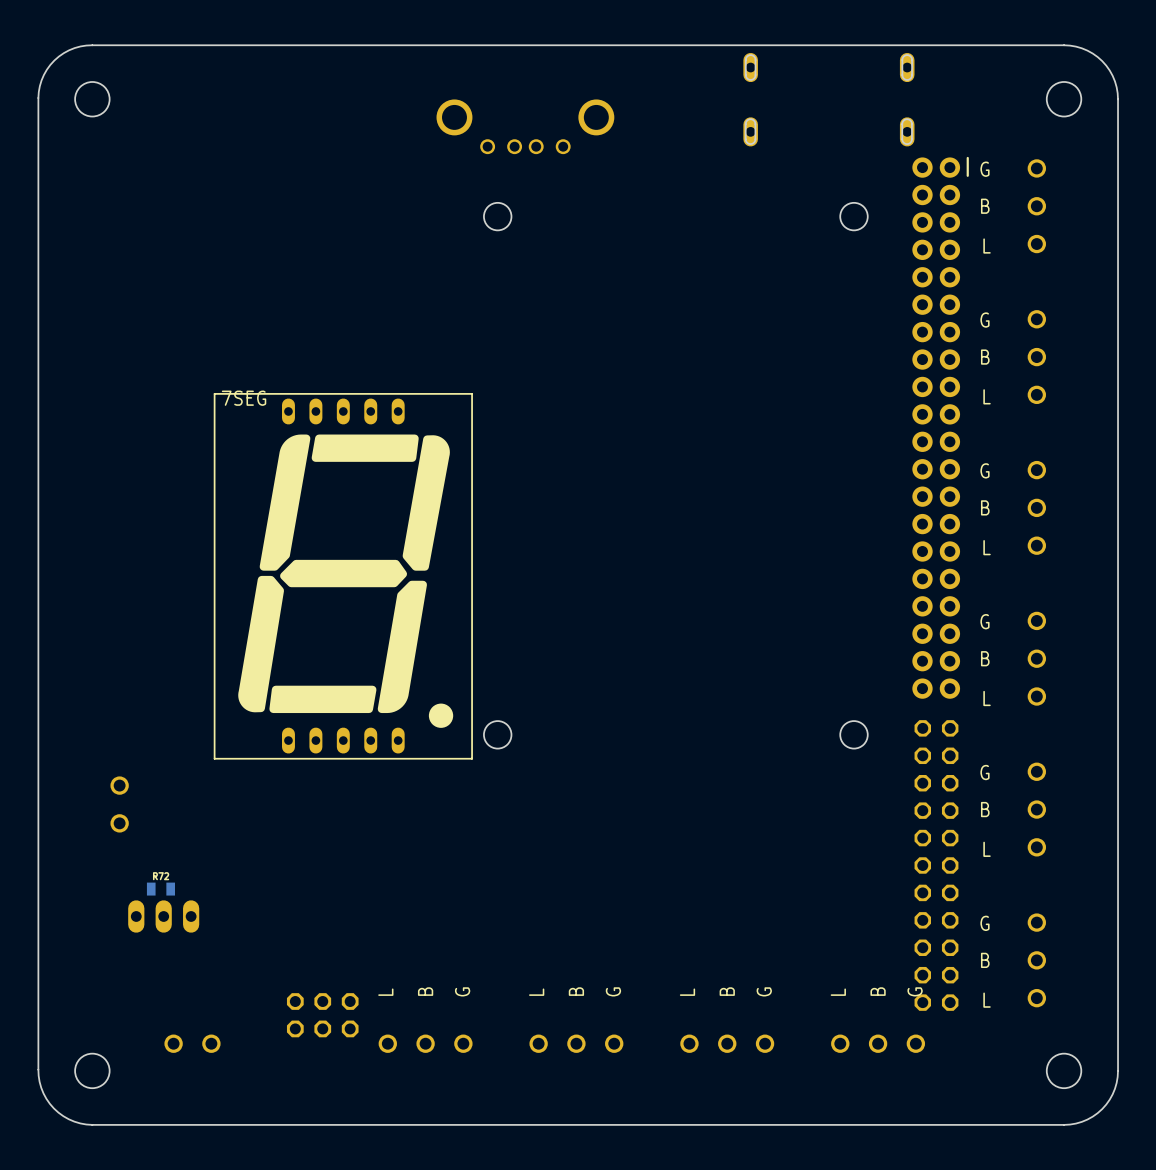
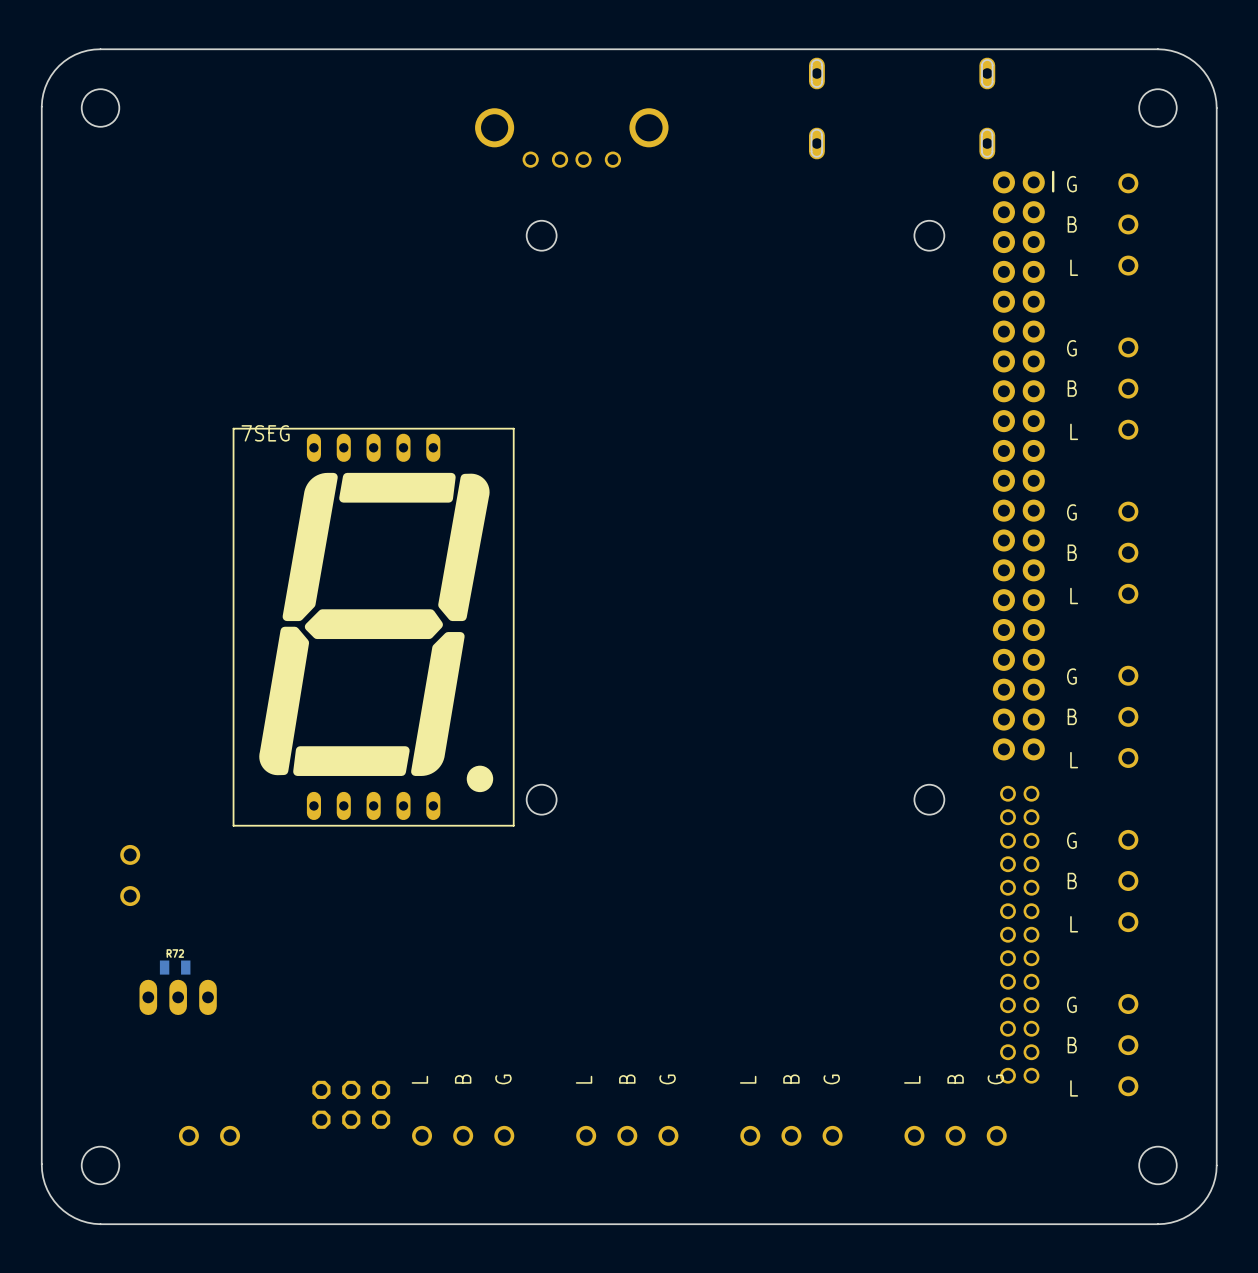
part footprint: [914, 720, 959, 1011] -> [1000, 785, 1040, 1084]

